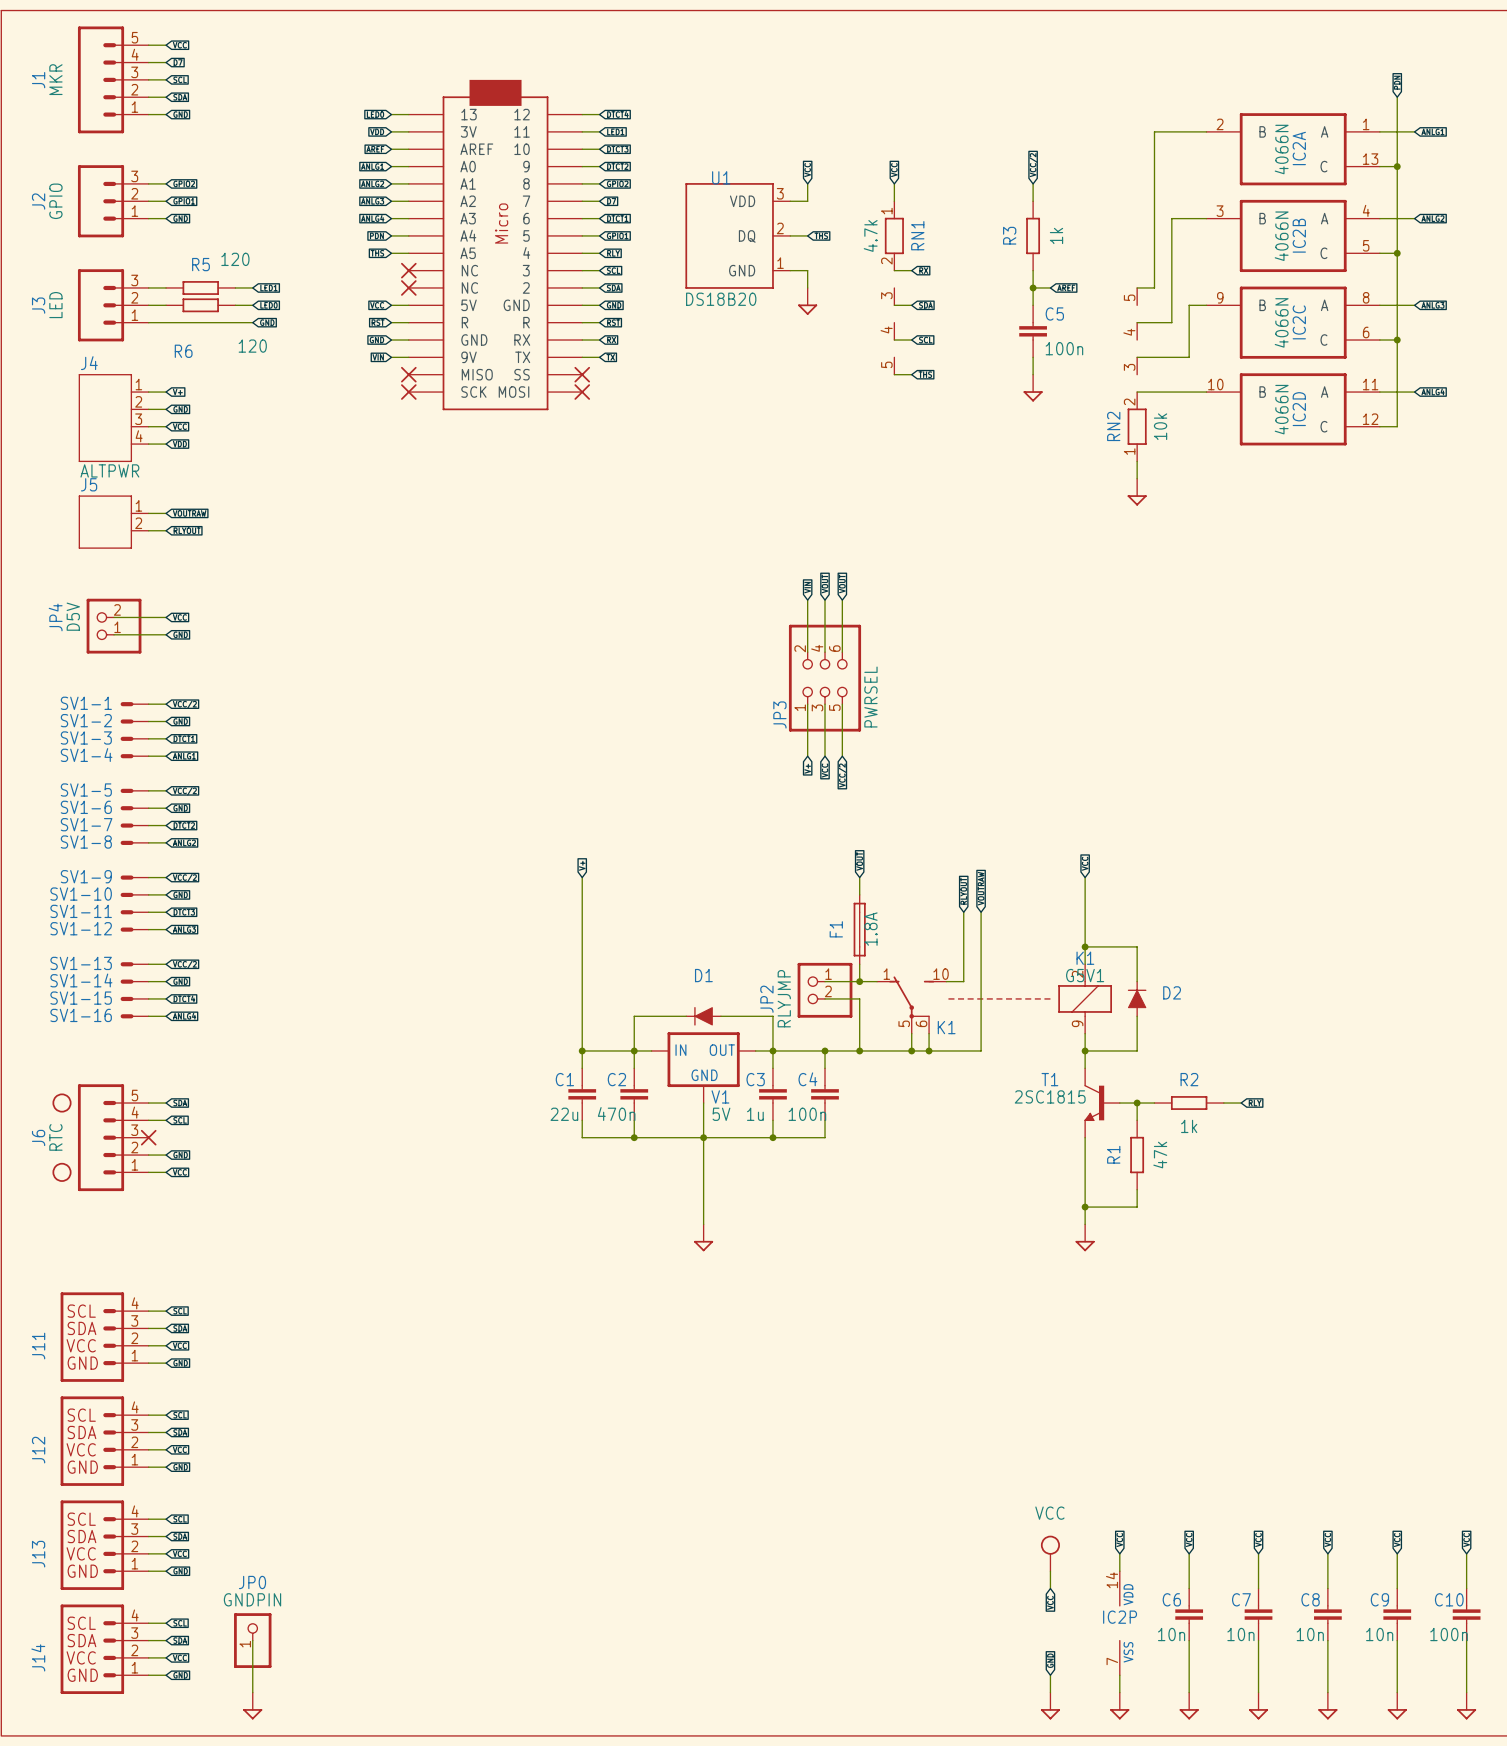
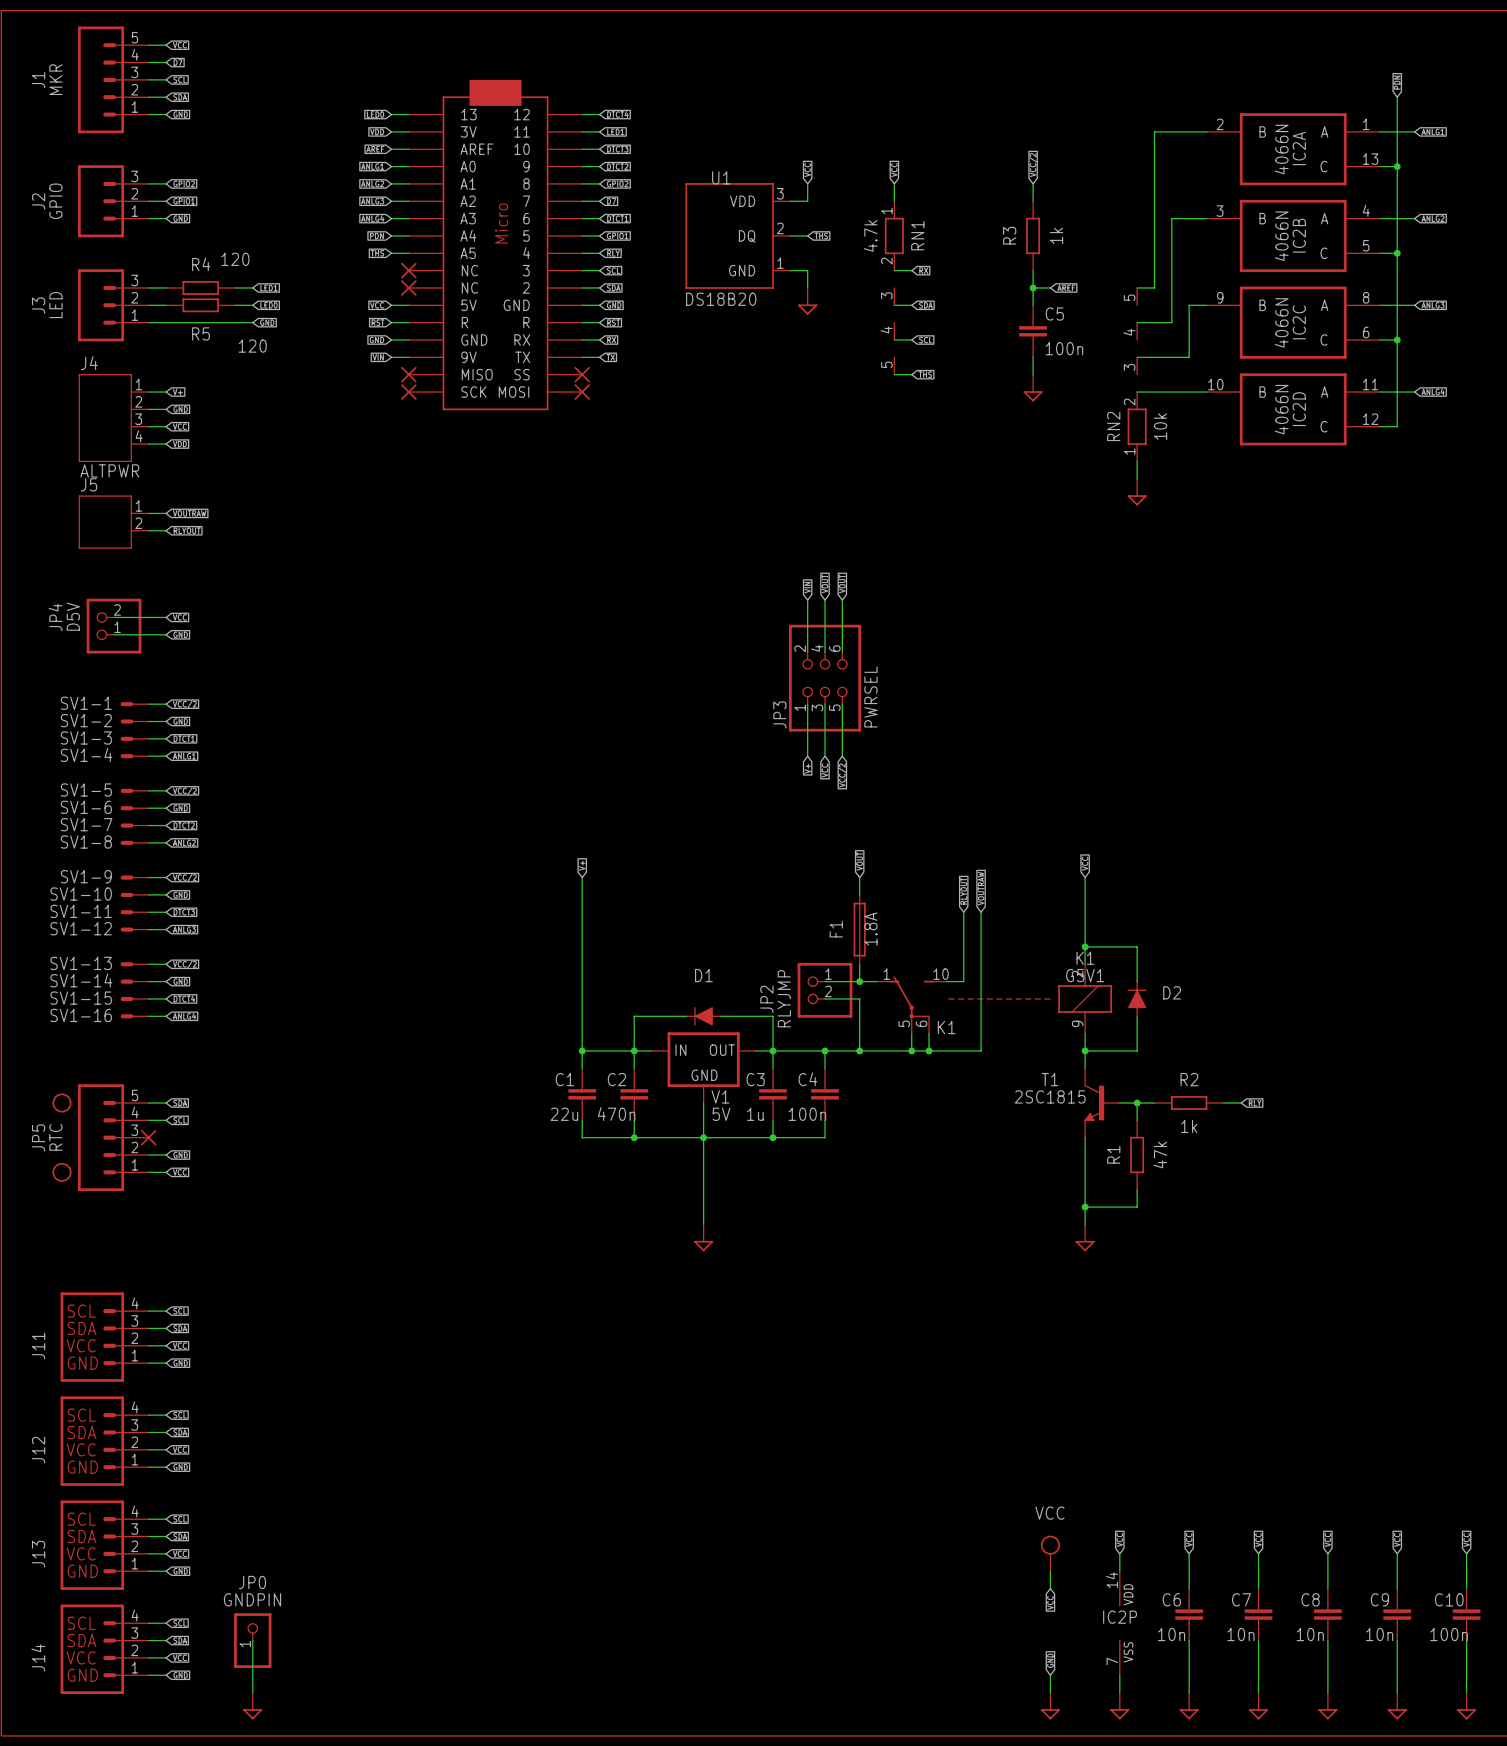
R5 name: R5 (200, 264) -> R4 (201, 264)
R6 name: R6 (183, 351) -> R5 (200, 333)
J6 name: J6 (38, 1137) -> JP5 (38, 1137)

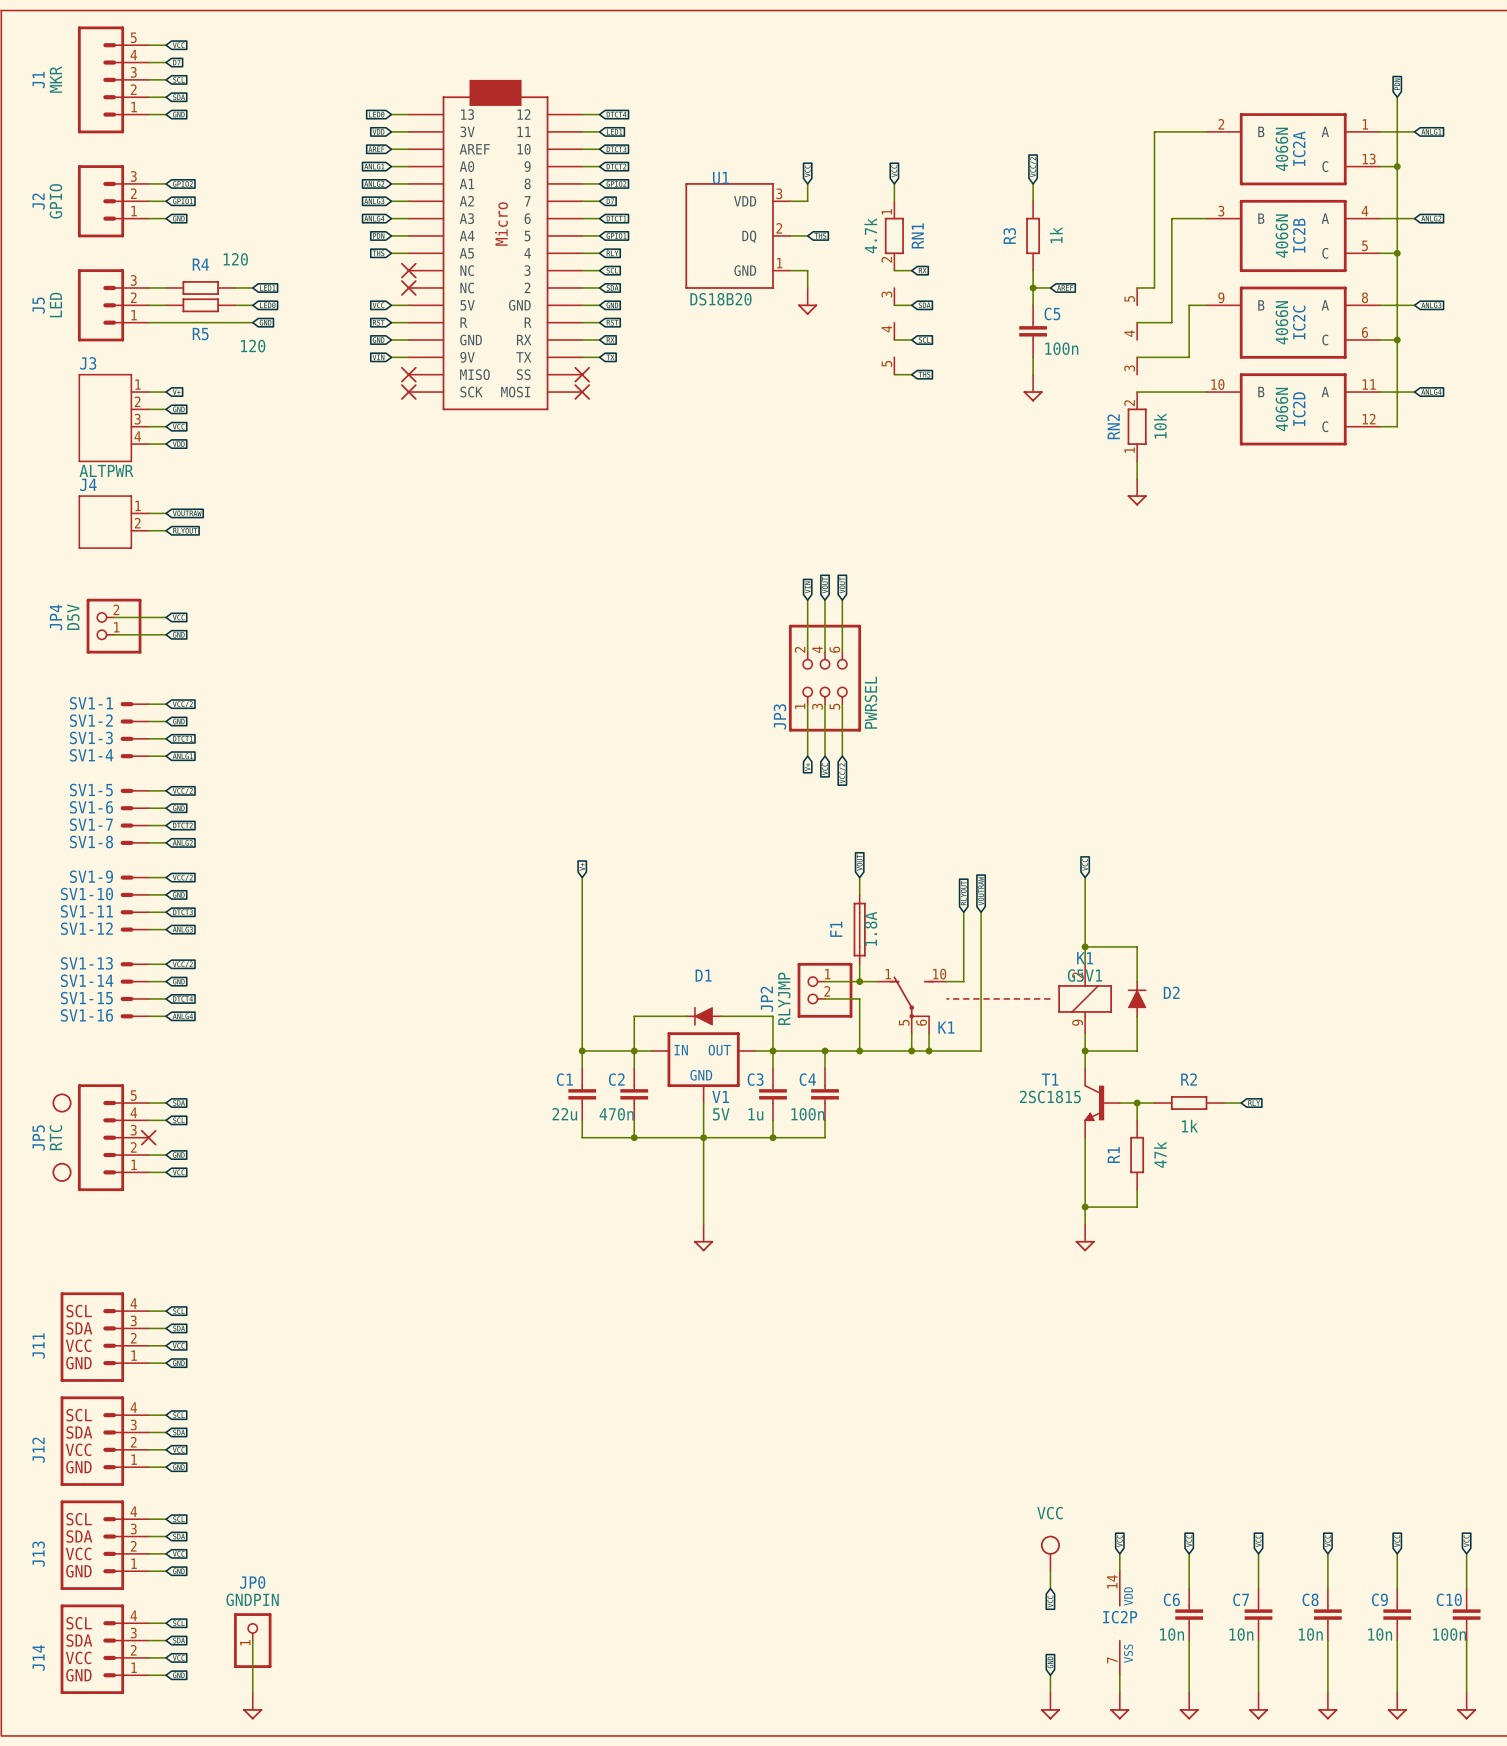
J3 name: J3 (38, 305) -> J5 (38, 305)
J4 name: J4 (89, 363) -> J3 (88, 363)
J5 name: J5 (89, 484) -> J4 (88, 484)

